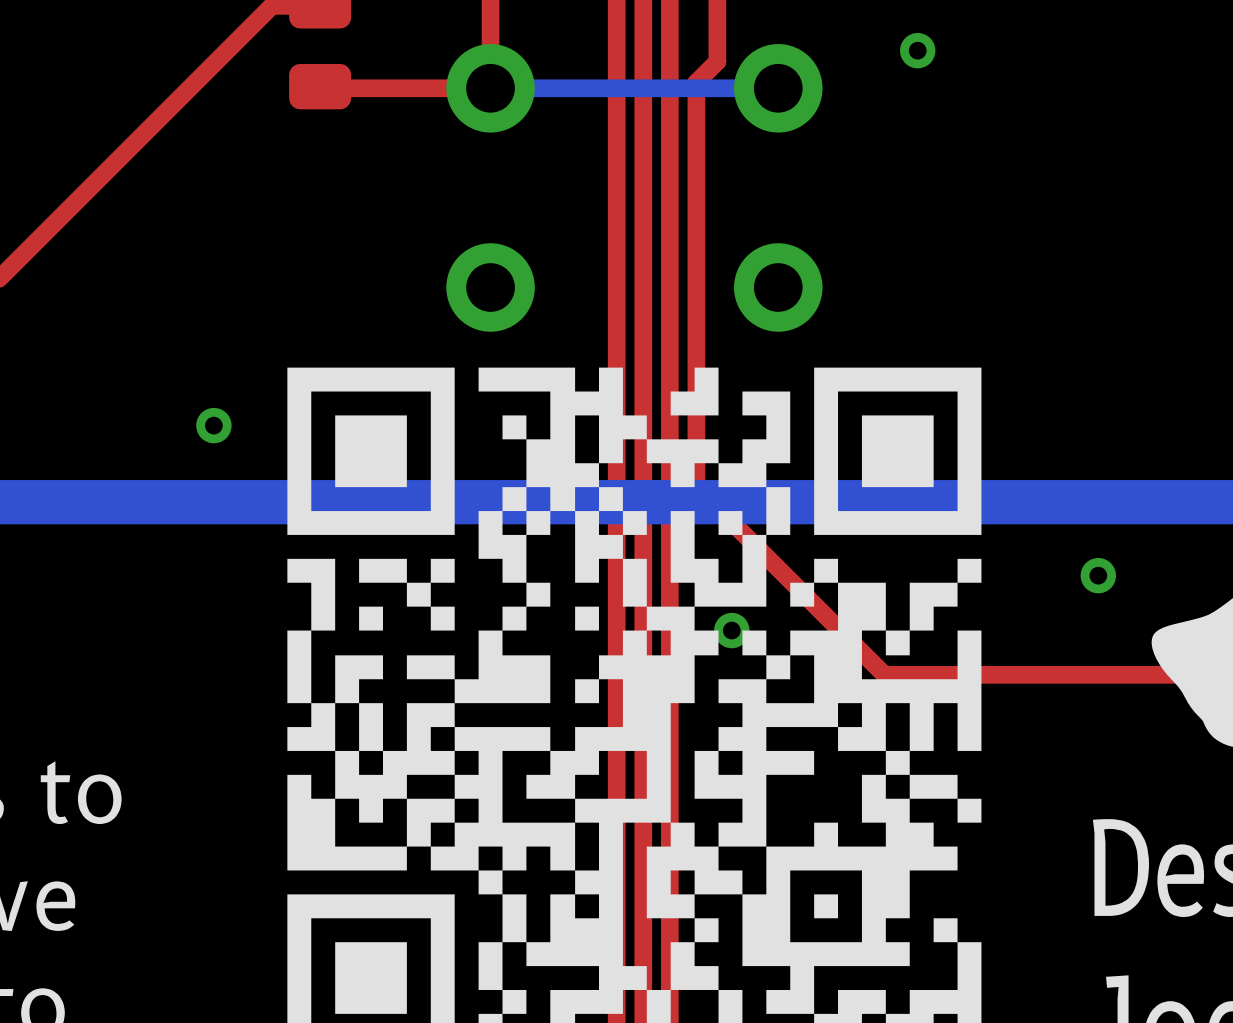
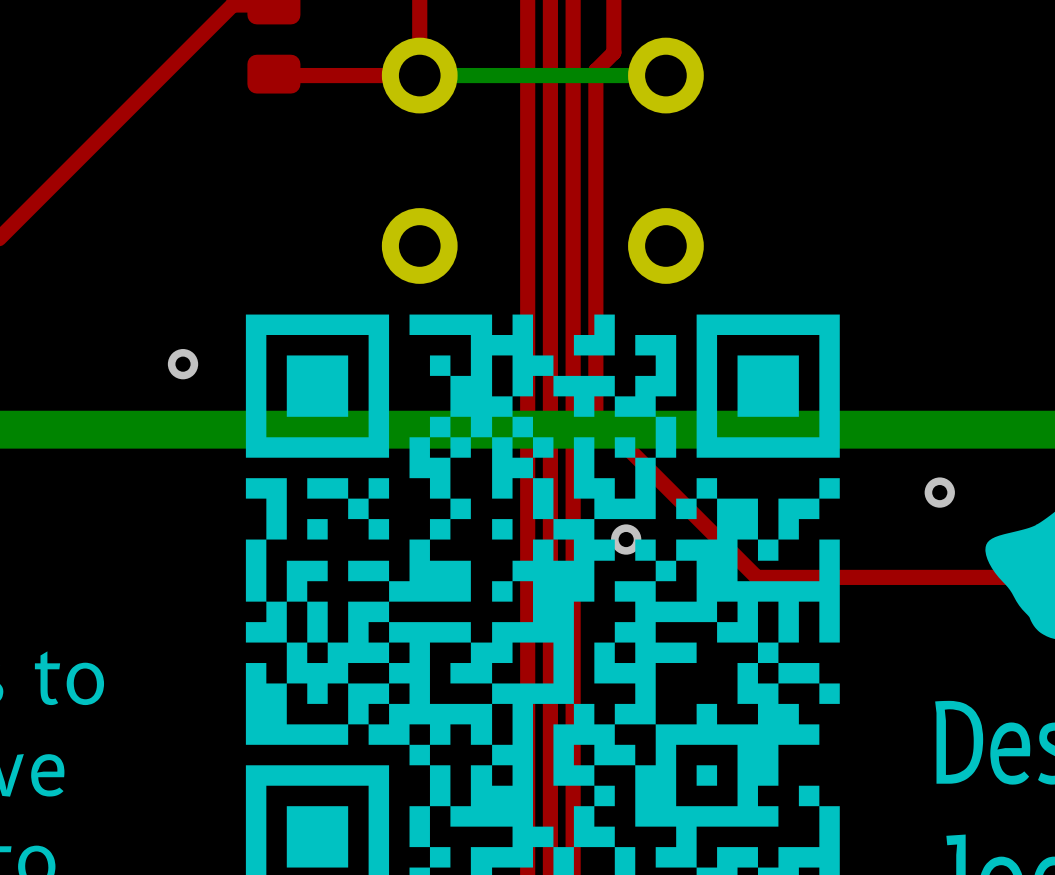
via: (917, 50) -> none

